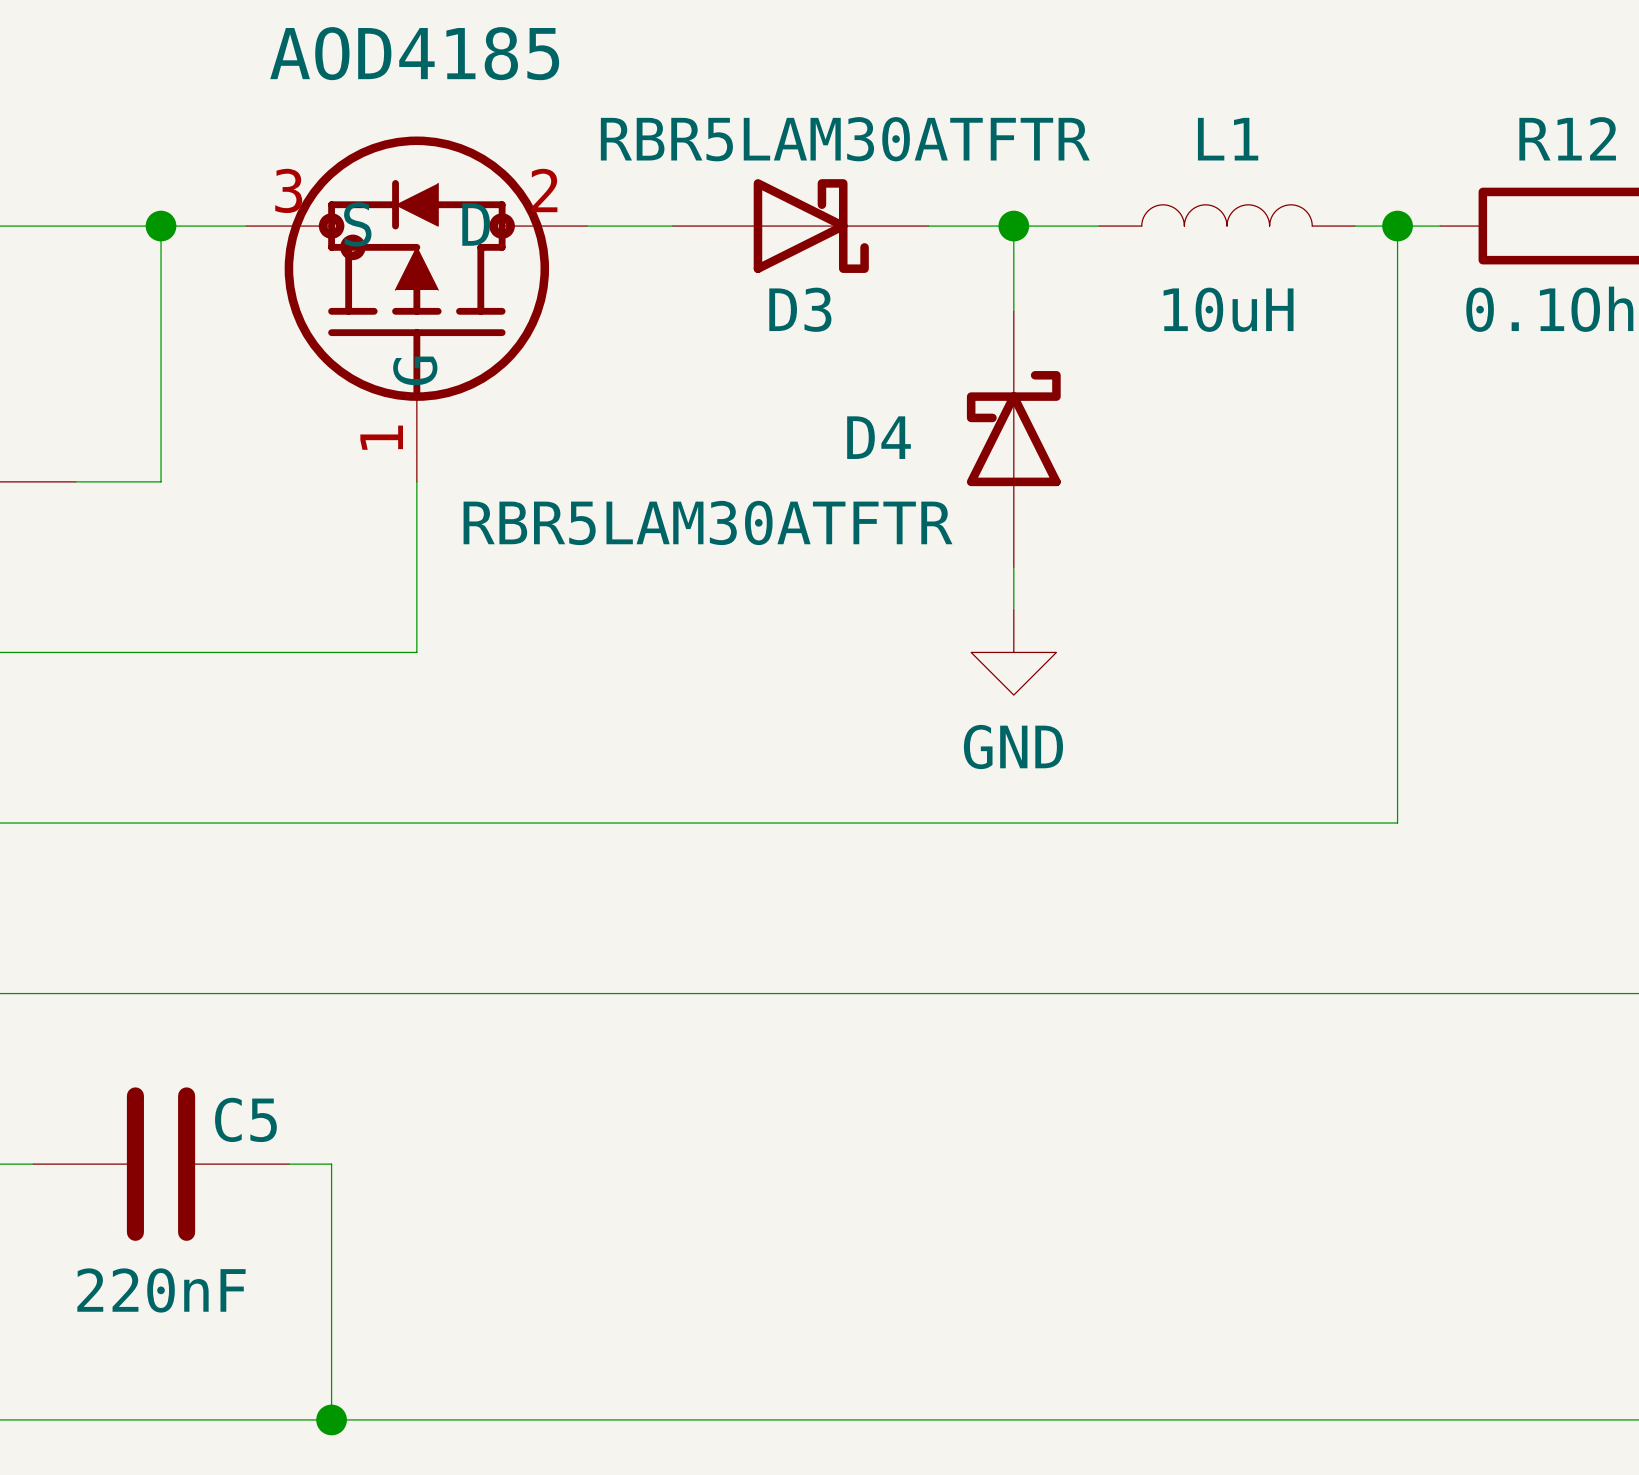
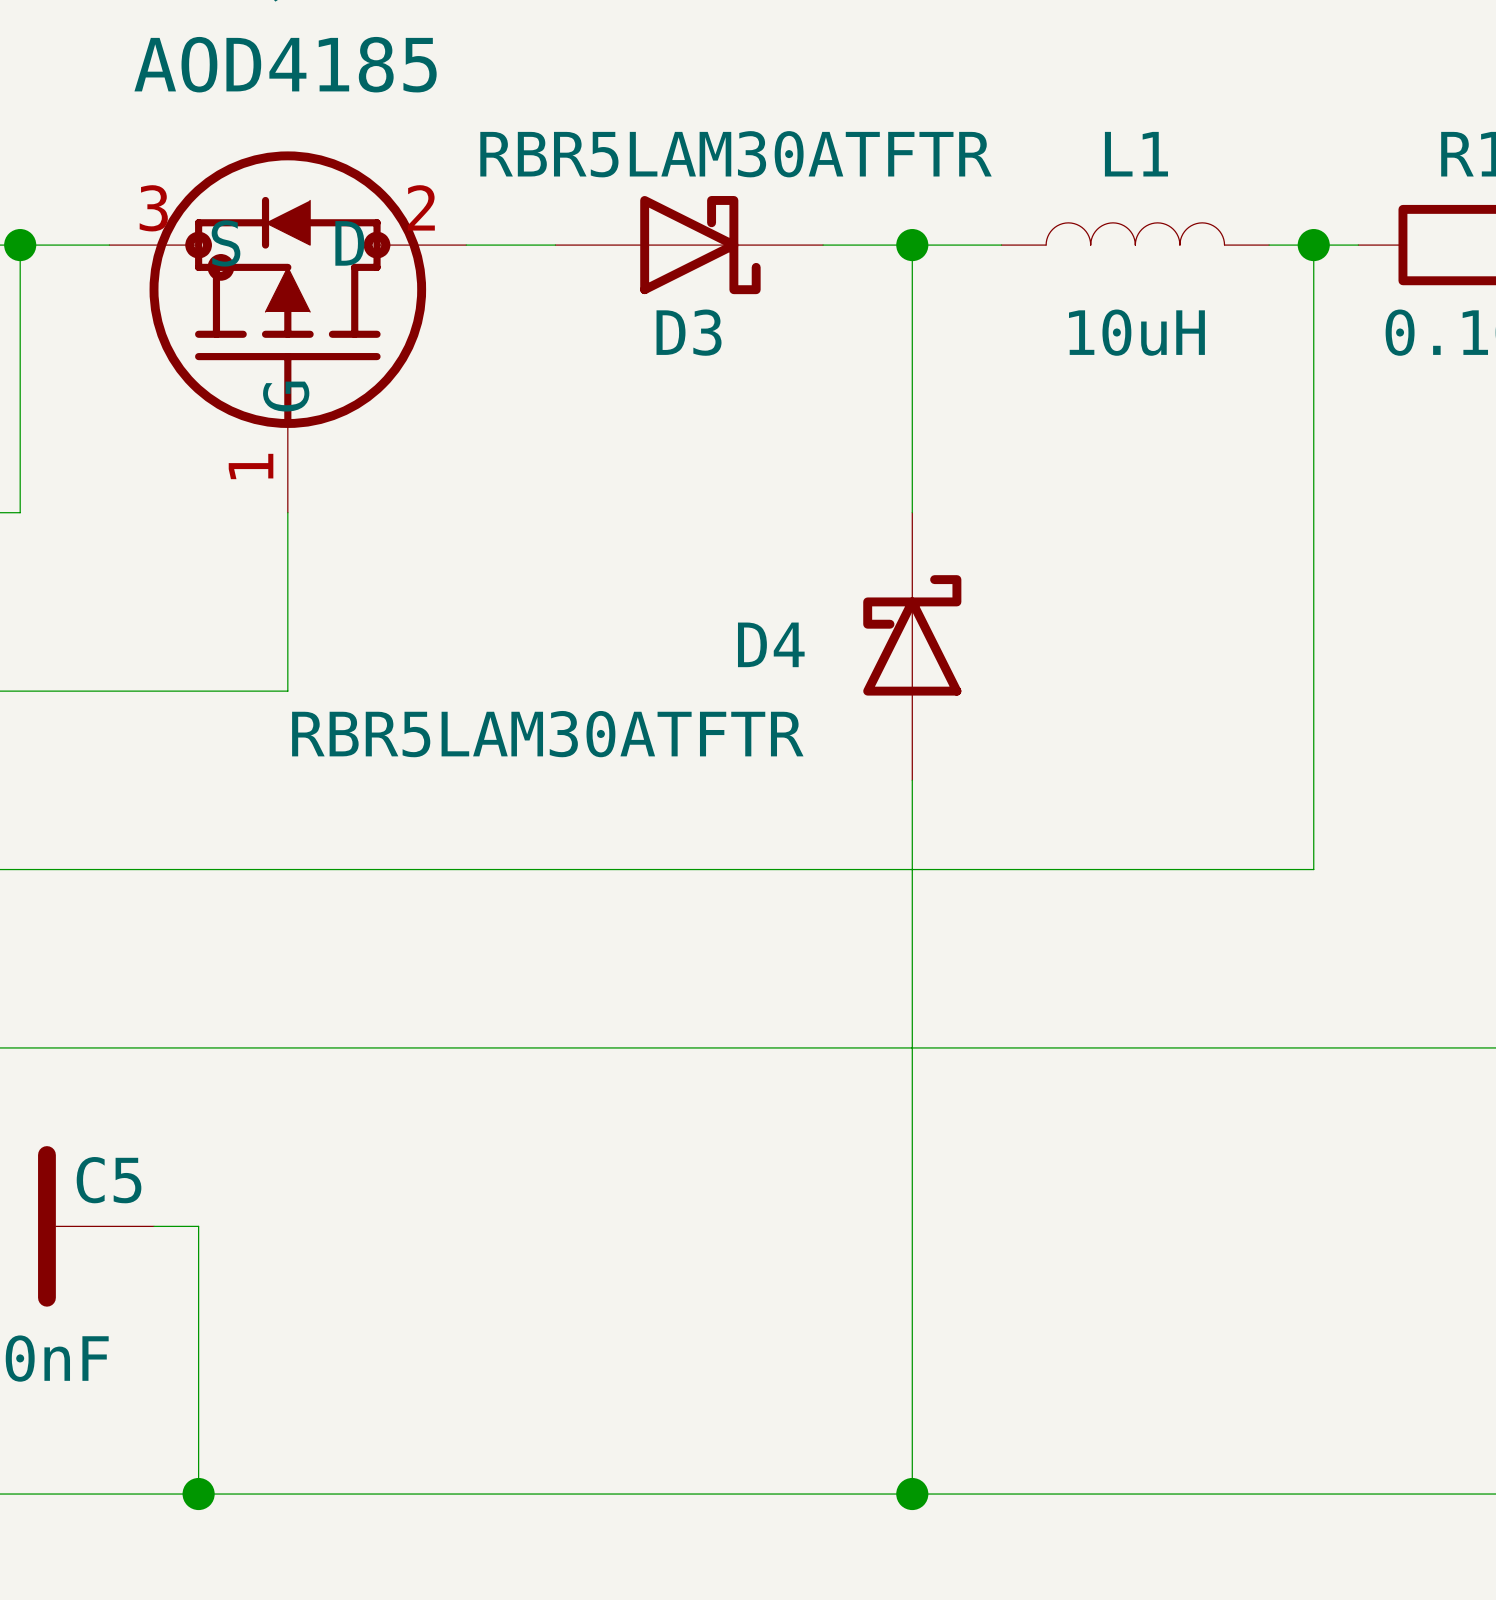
D4 position: (1013, 439) -> (912, 646)
D4 value position: RBR5LAM30ATFTR (708, 522) -> RBR5LAM30ATFTR (547, 734)
power symbol: GND (1013, 652) -> none
wire: none -> (912, 780) (912, 1494)
junction: none -> (912, 1494)

